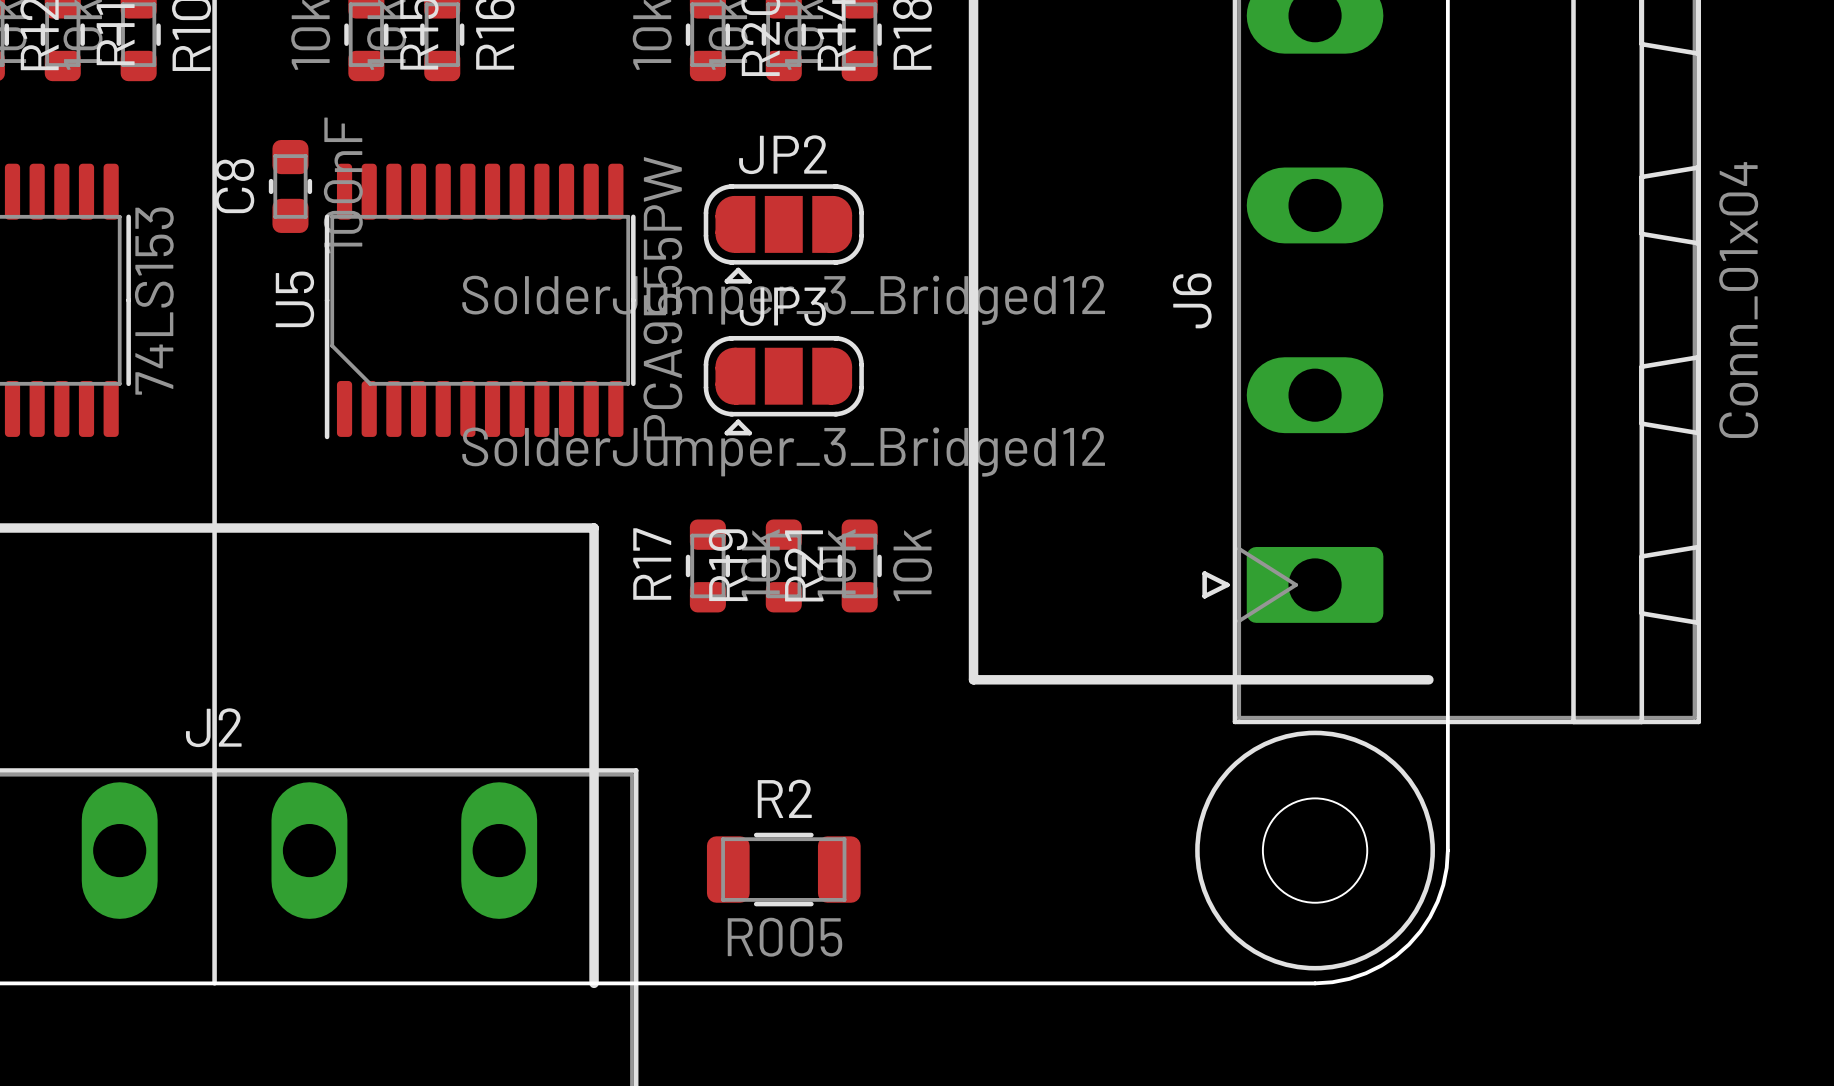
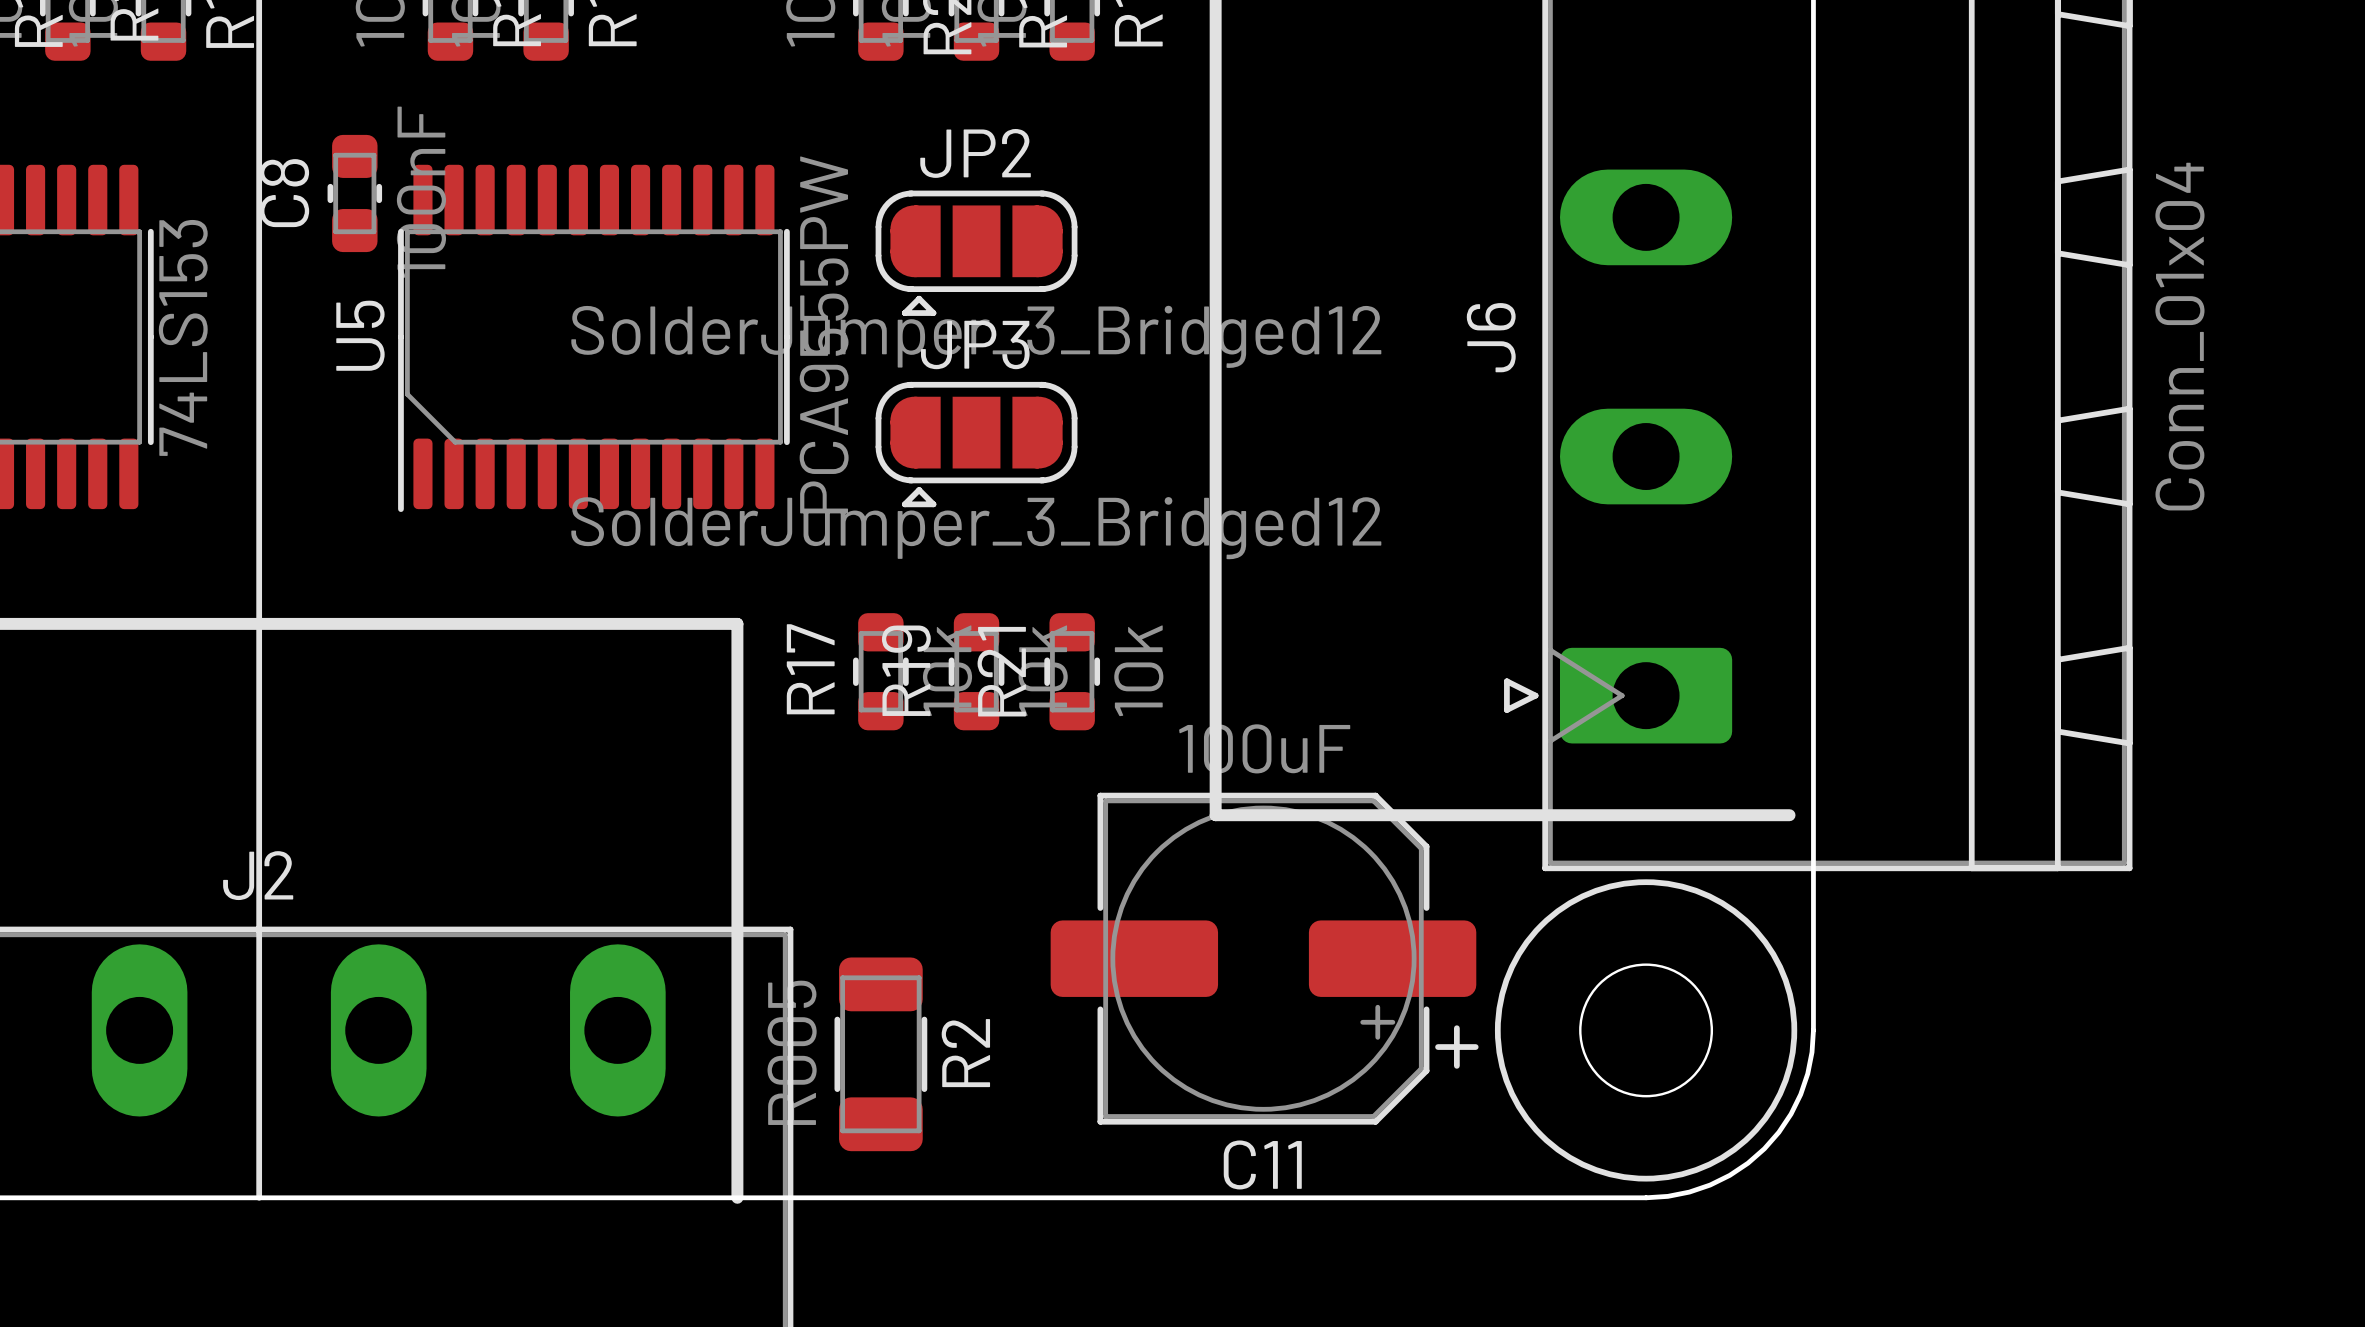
C11: none -> 100uF (1264, 958)
R2 rotation: 0° (783, 869) -> 90° clockwise (880, 1054)

